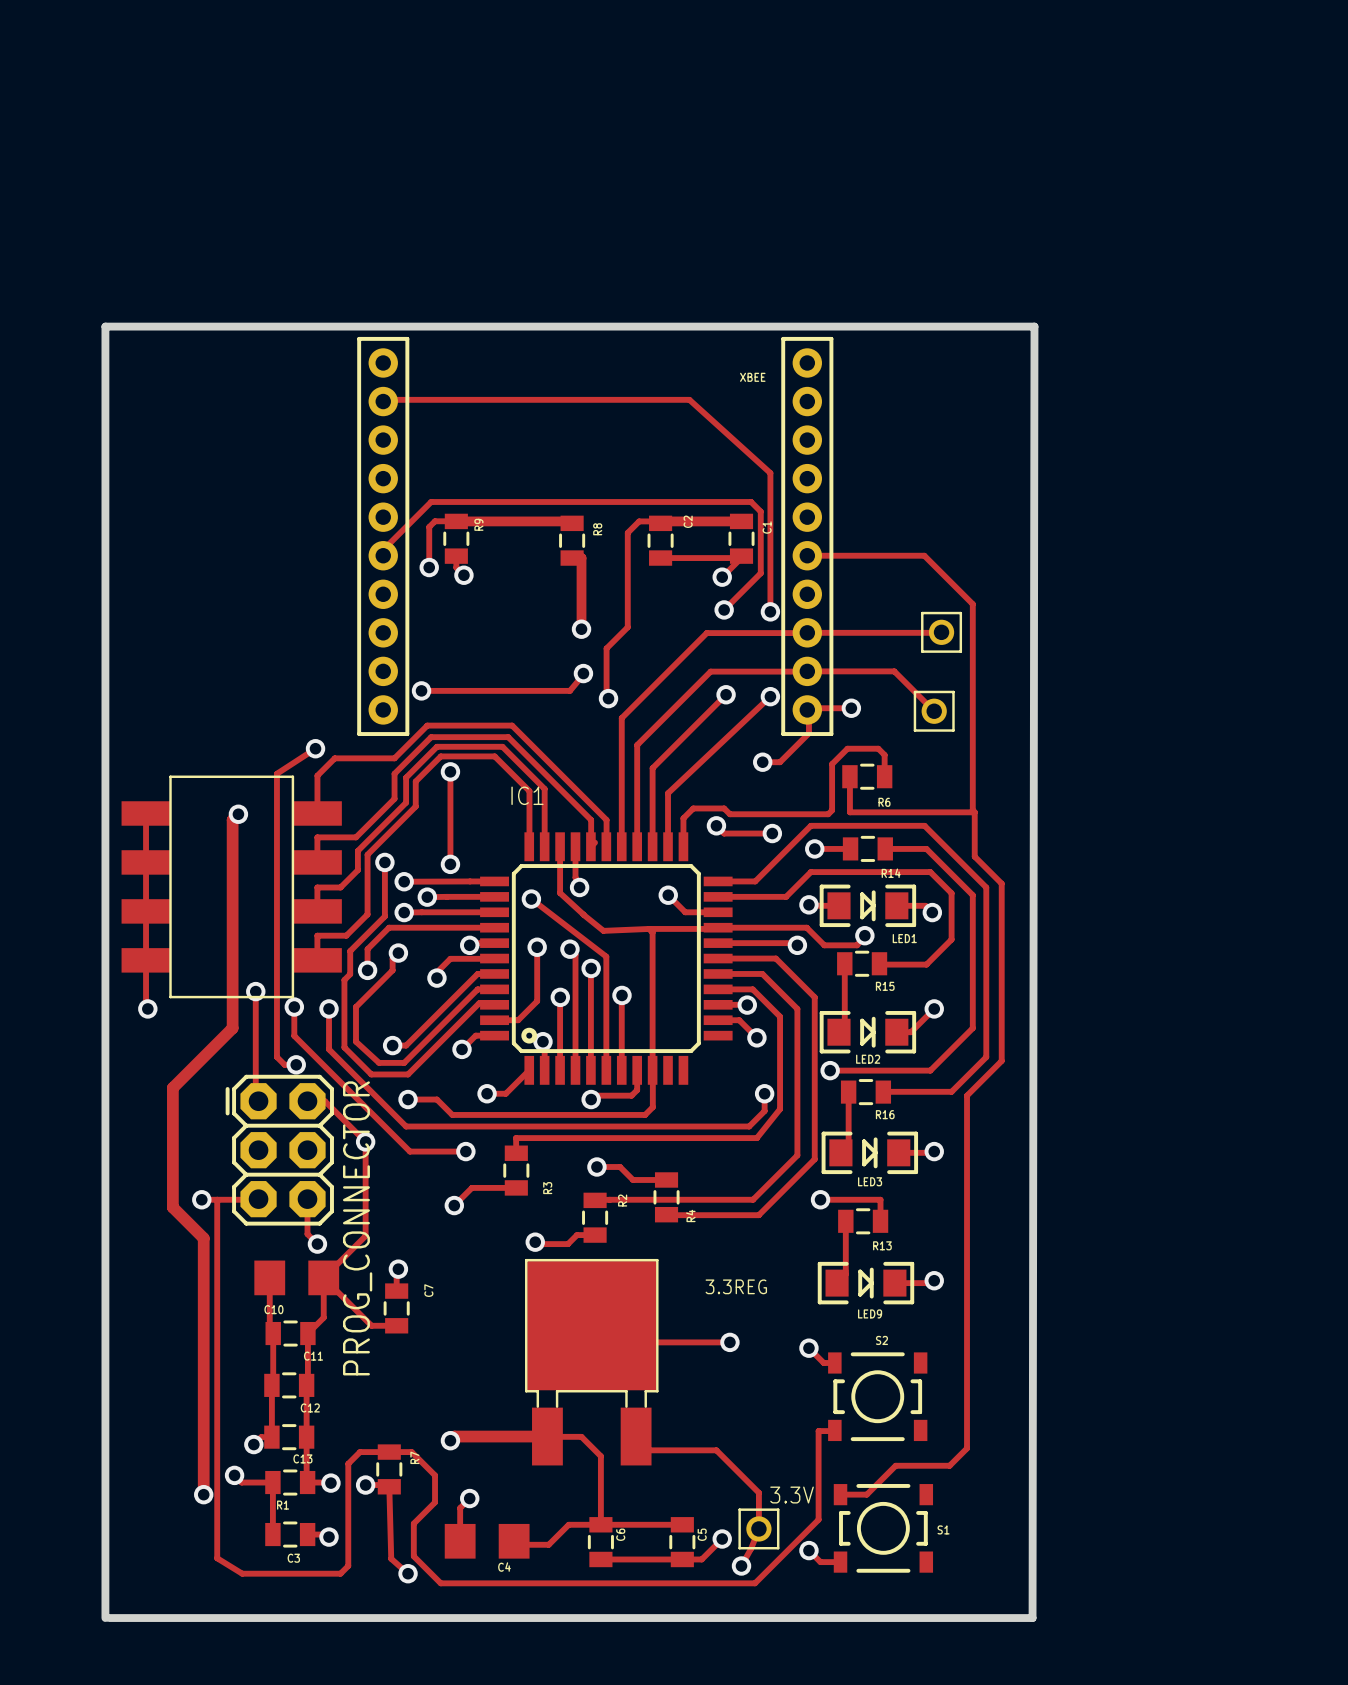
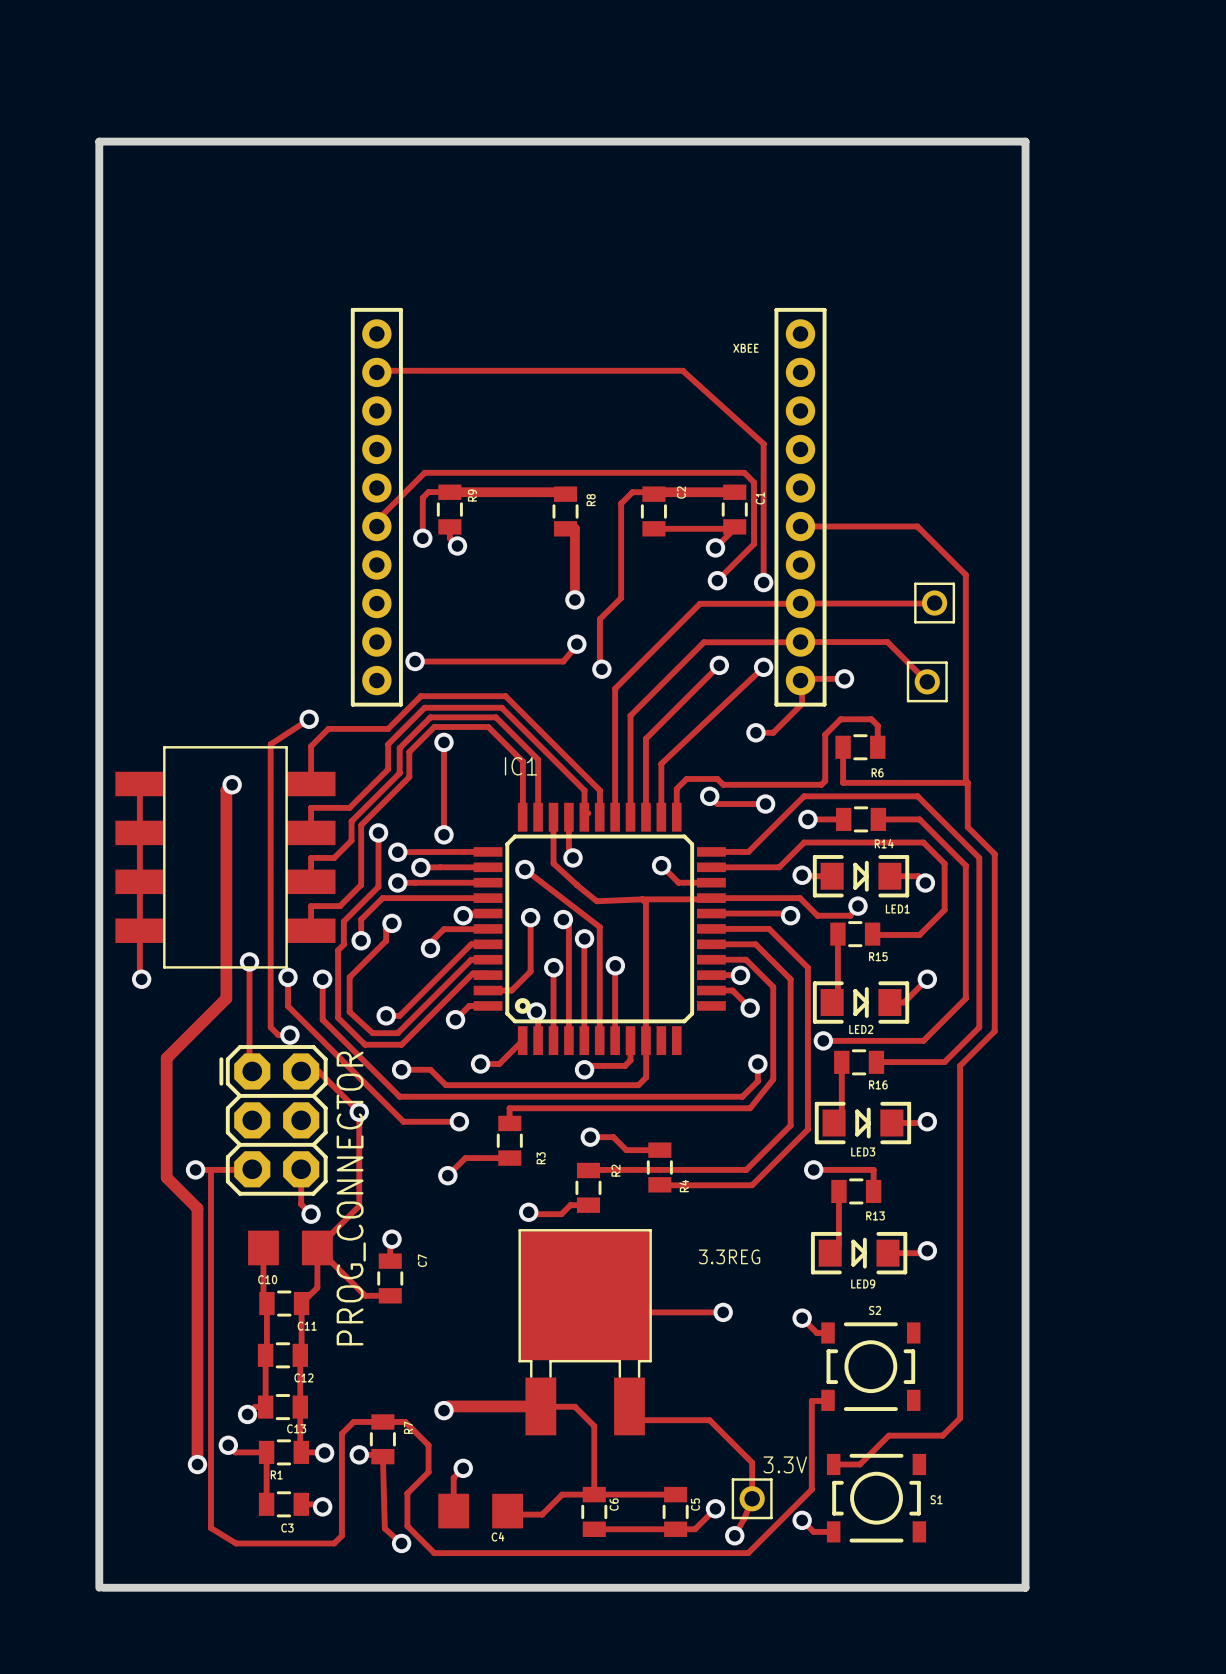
board edge: (105, 326) (1034, 326) (1032, 1618) -> (99, 297) (99, 141) (1025, 141) (1025, 1587)

